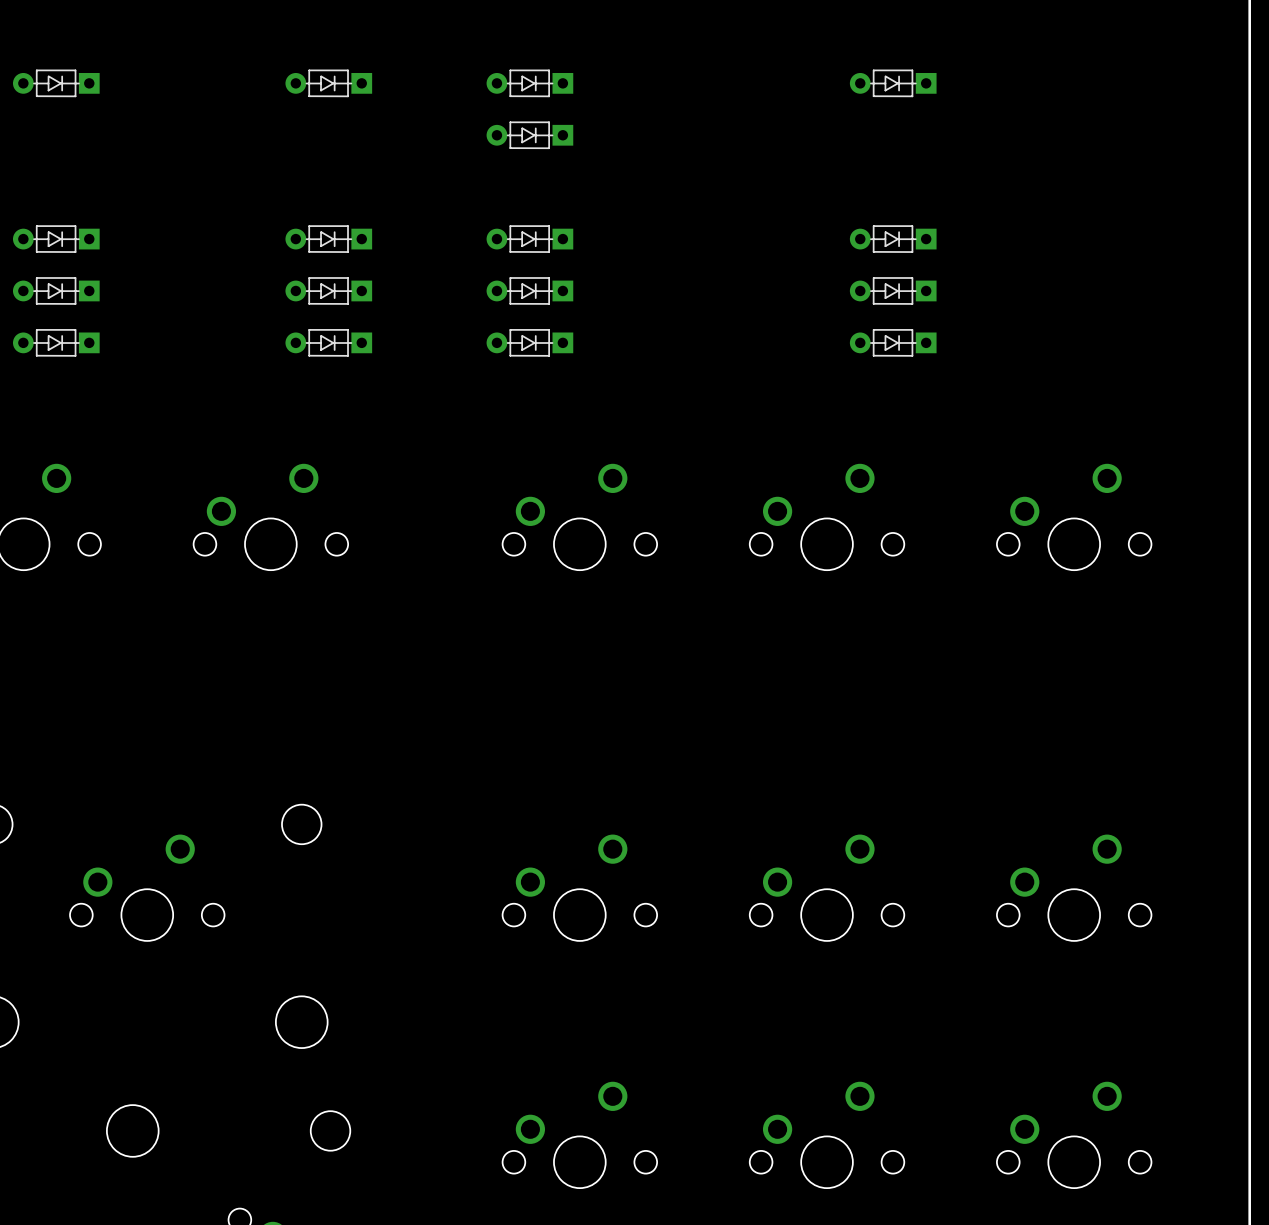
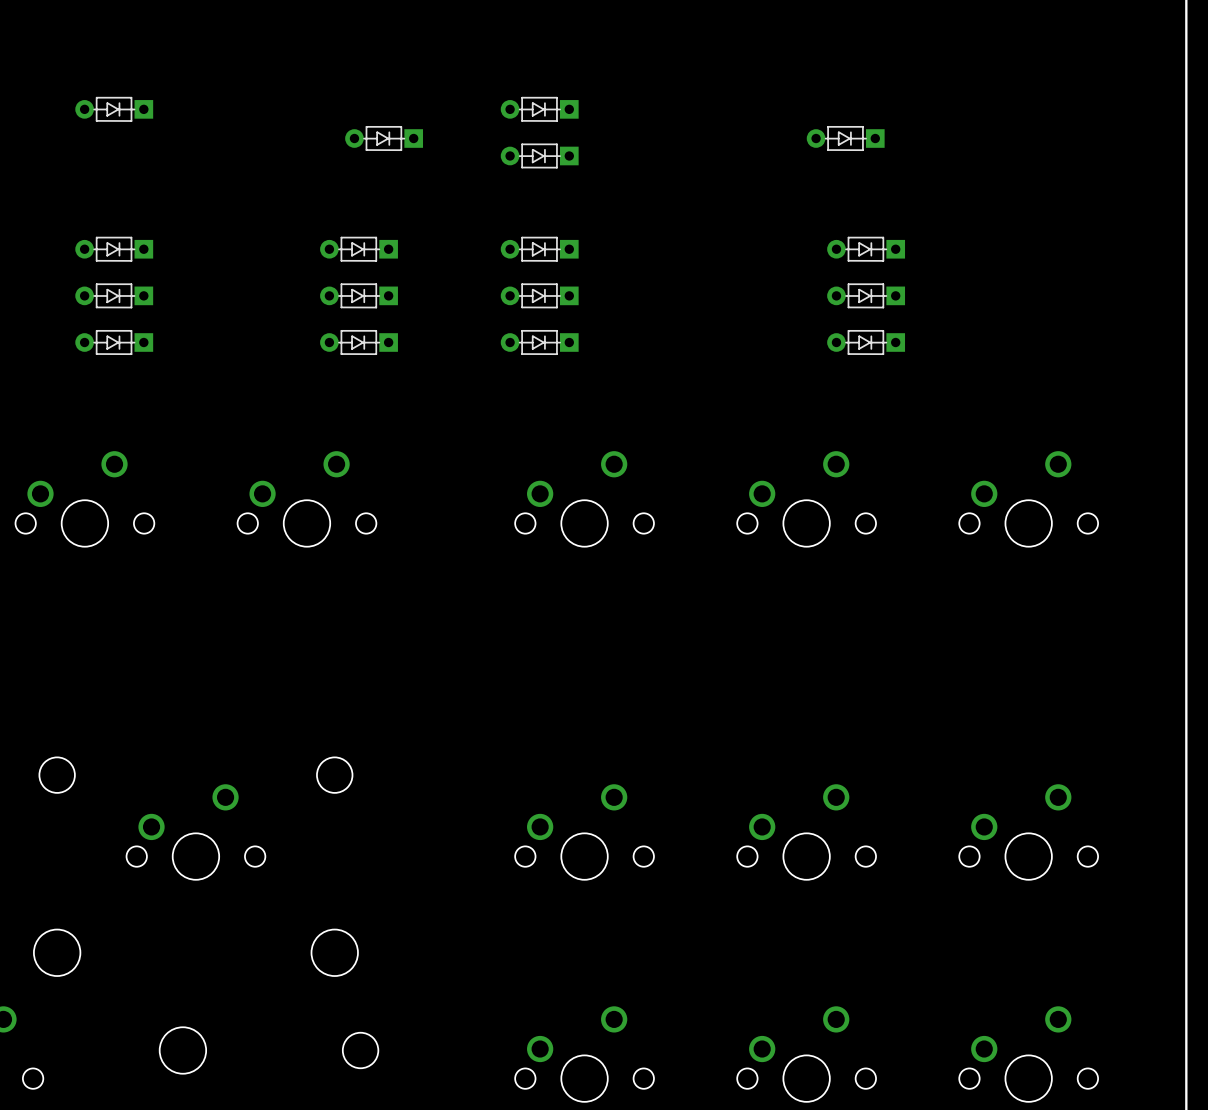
part position: (328, 83) -> (384, 138)
part position: (893, 83) -> (845, 138)

